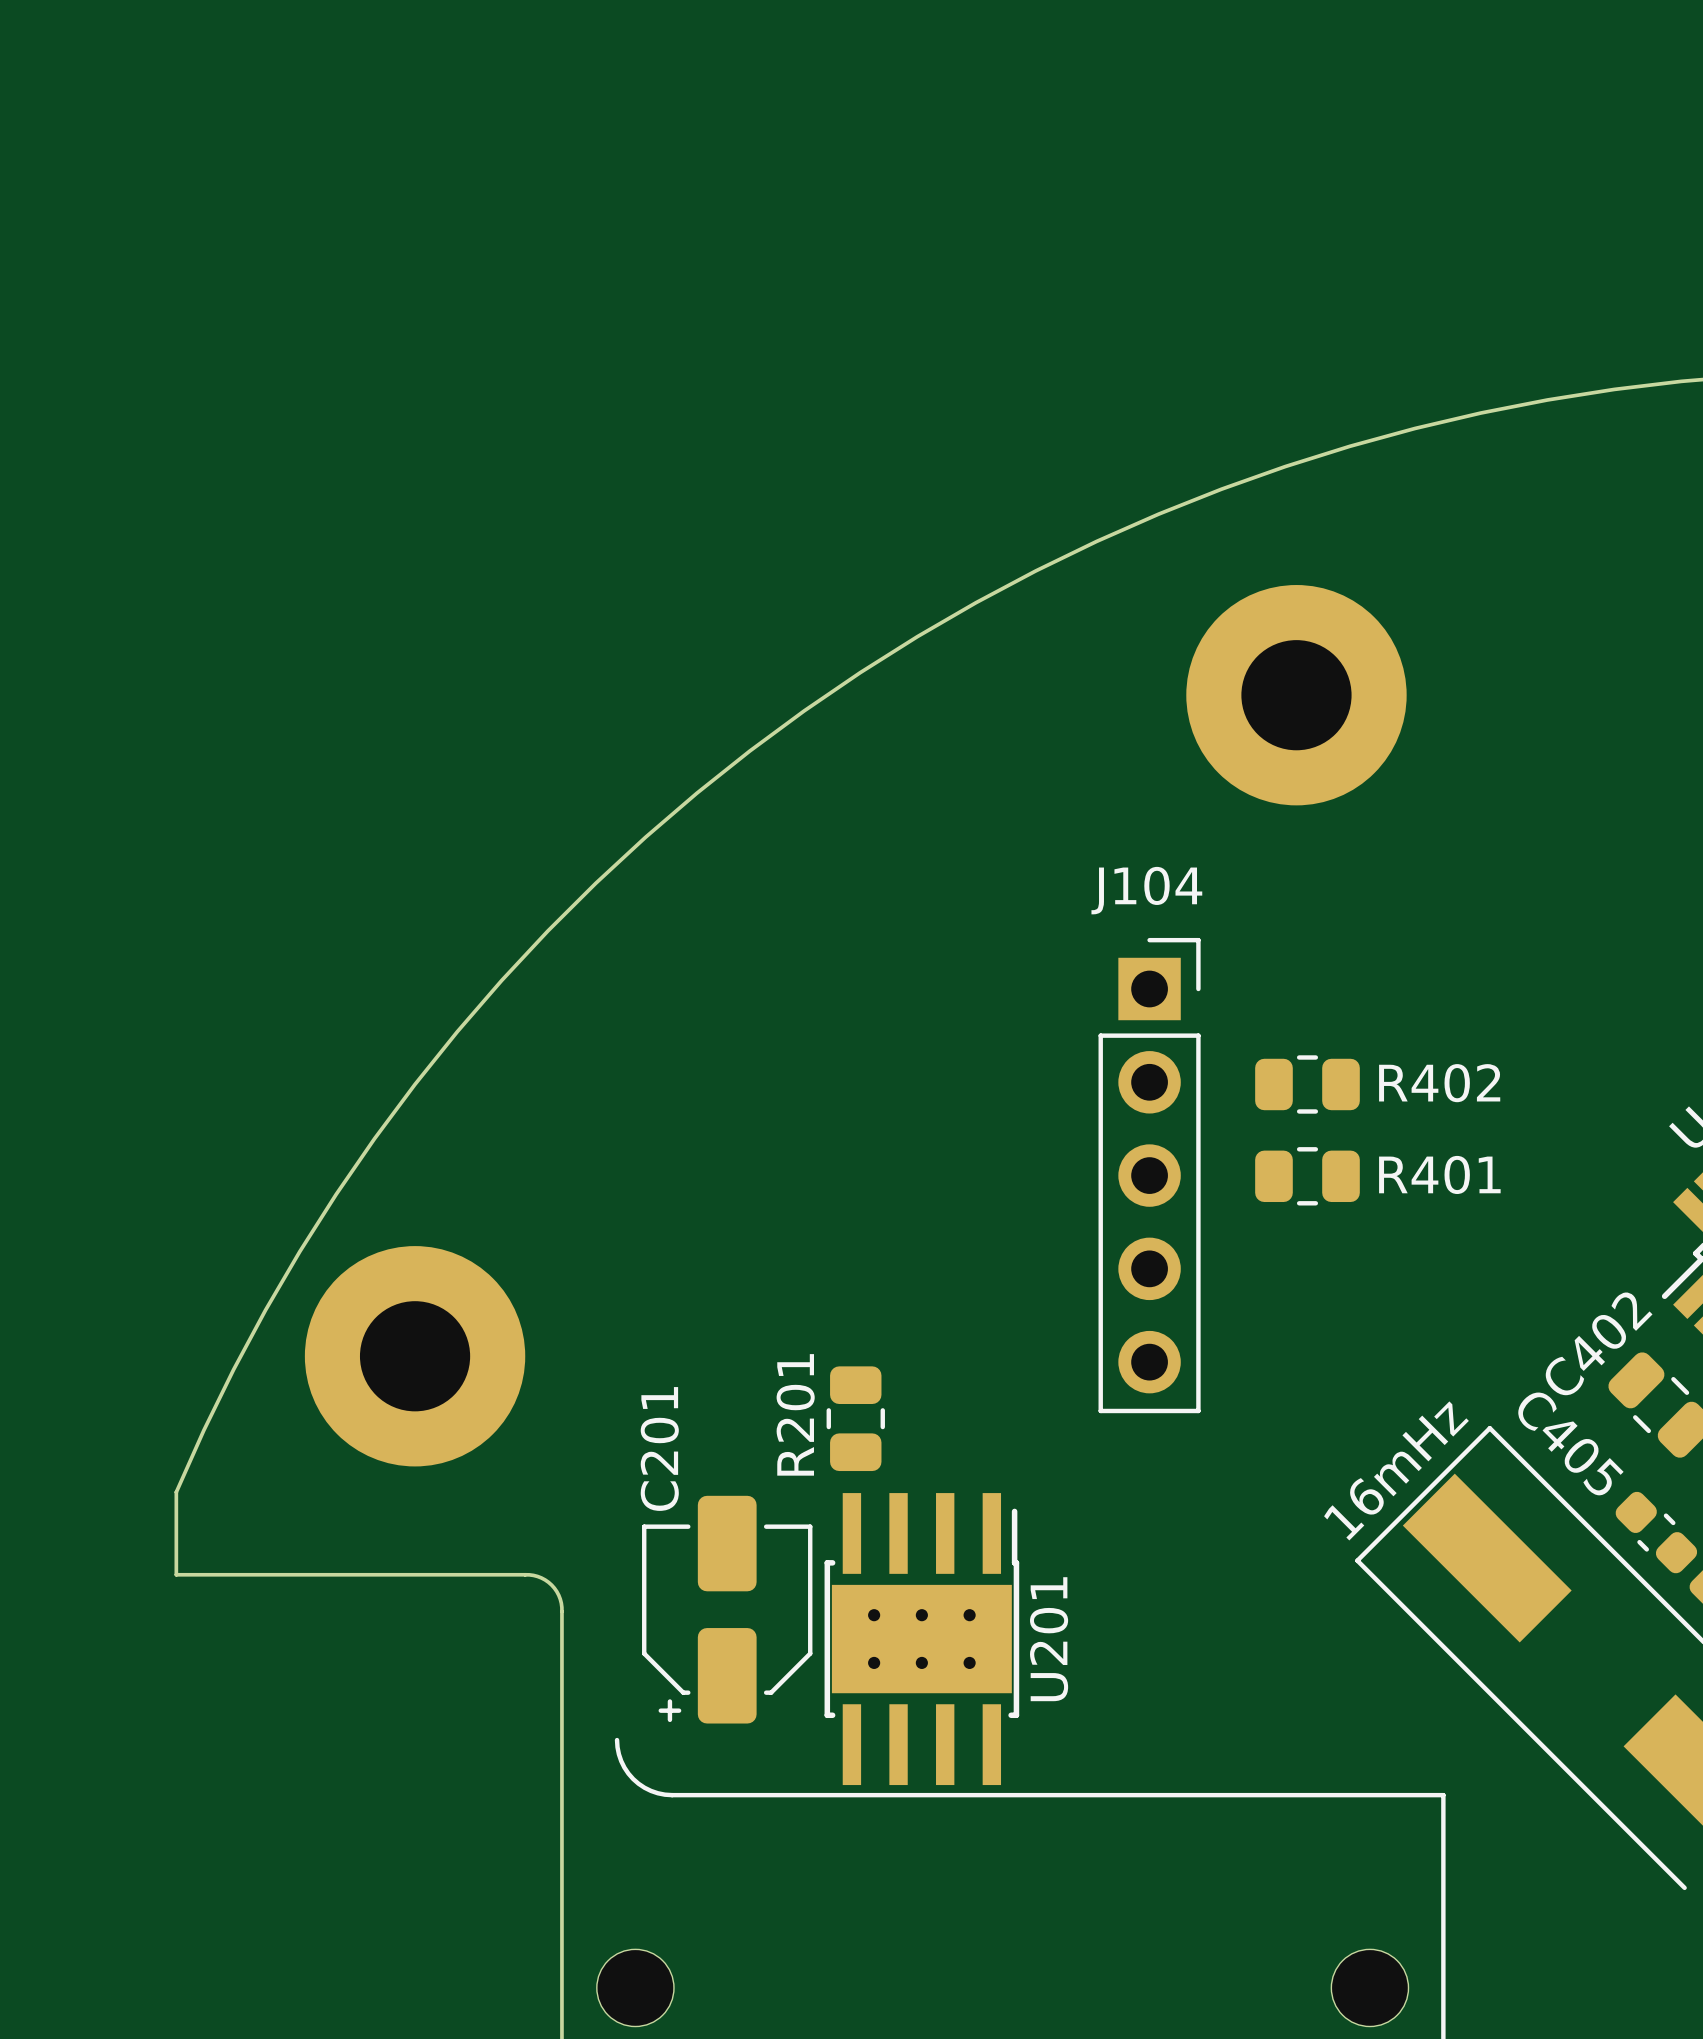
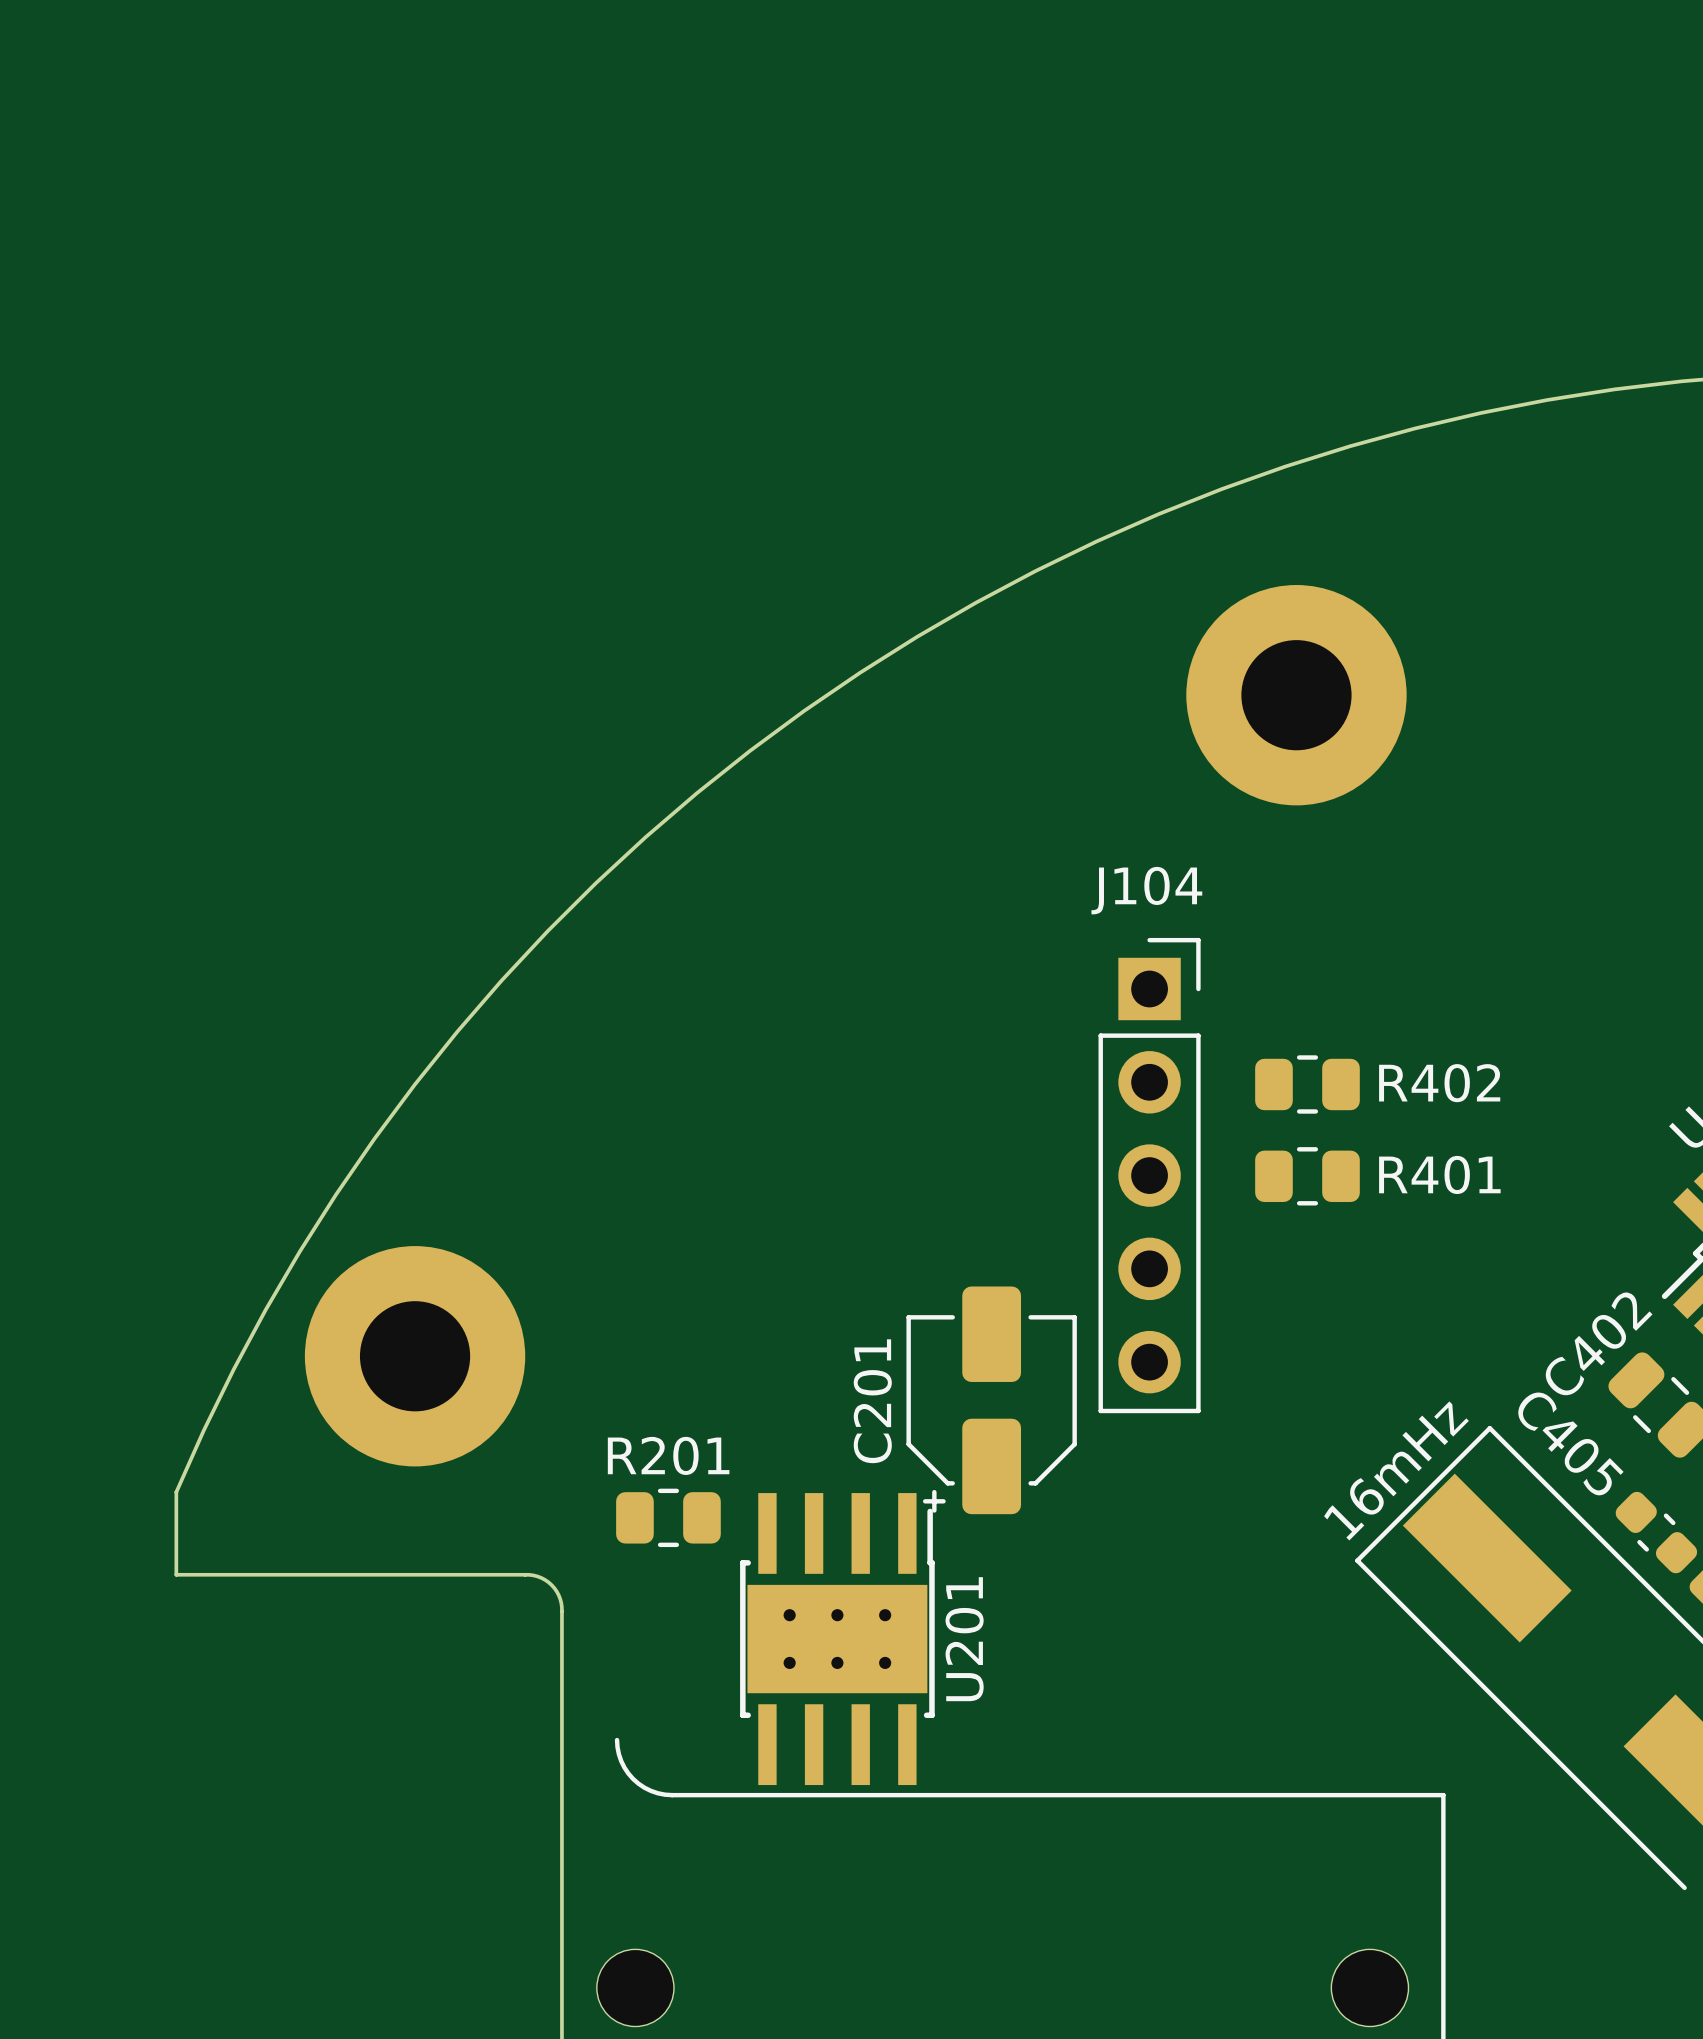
R201 rotation: 0° (855, 1418) -> 90° clockwise (668, 1517)
R201 position: (855, 1418) -> (668, 1517)
C201 name position: C201 (659, 1448) -> C201 (872, 1401)
C201 position: (727, 1609) -> (991, 1400)
U201 position: (921, 1639) -> (837, 1639)

